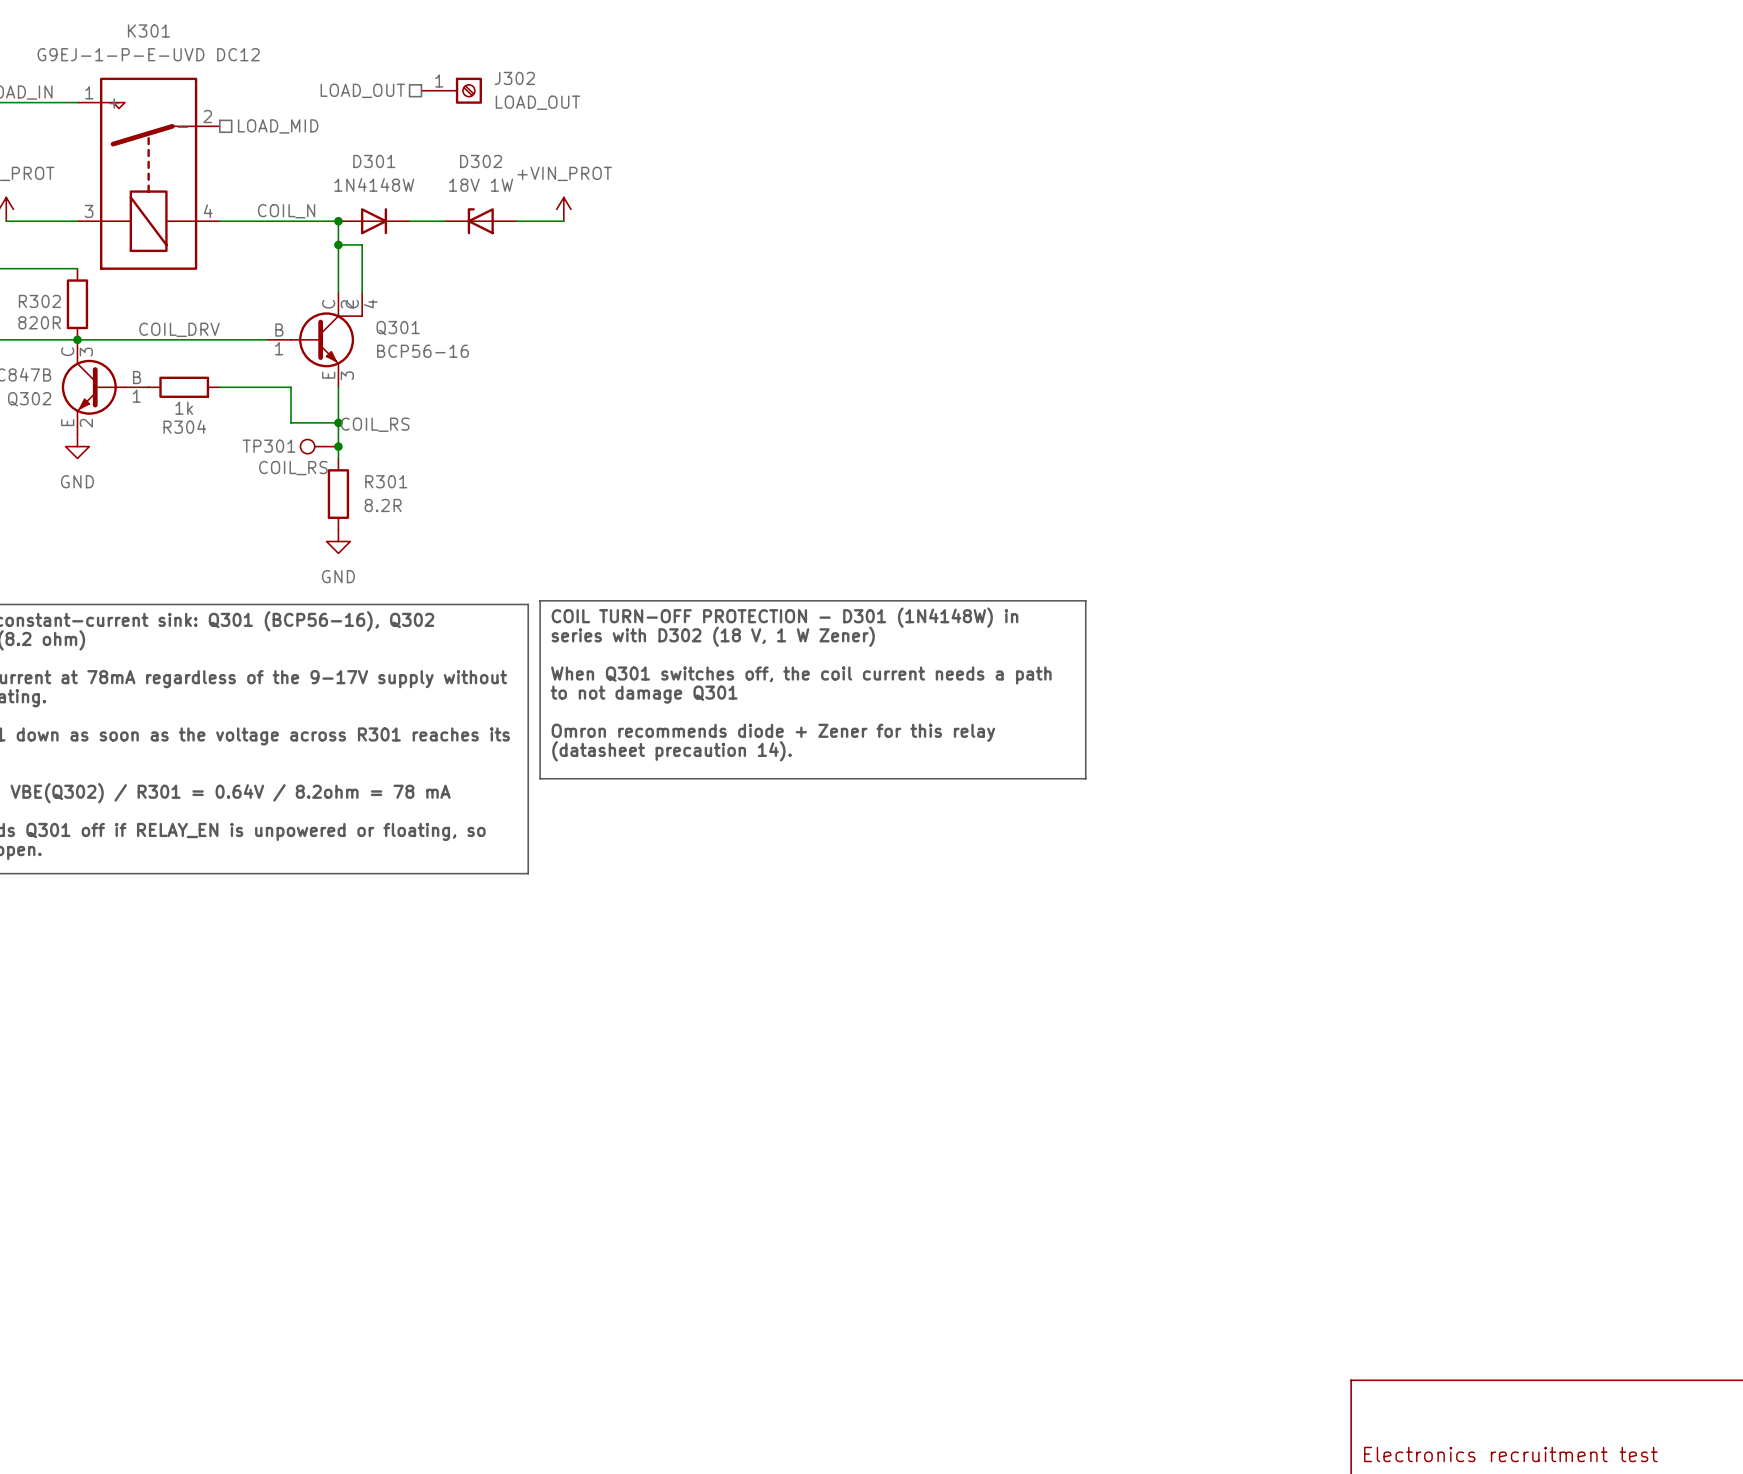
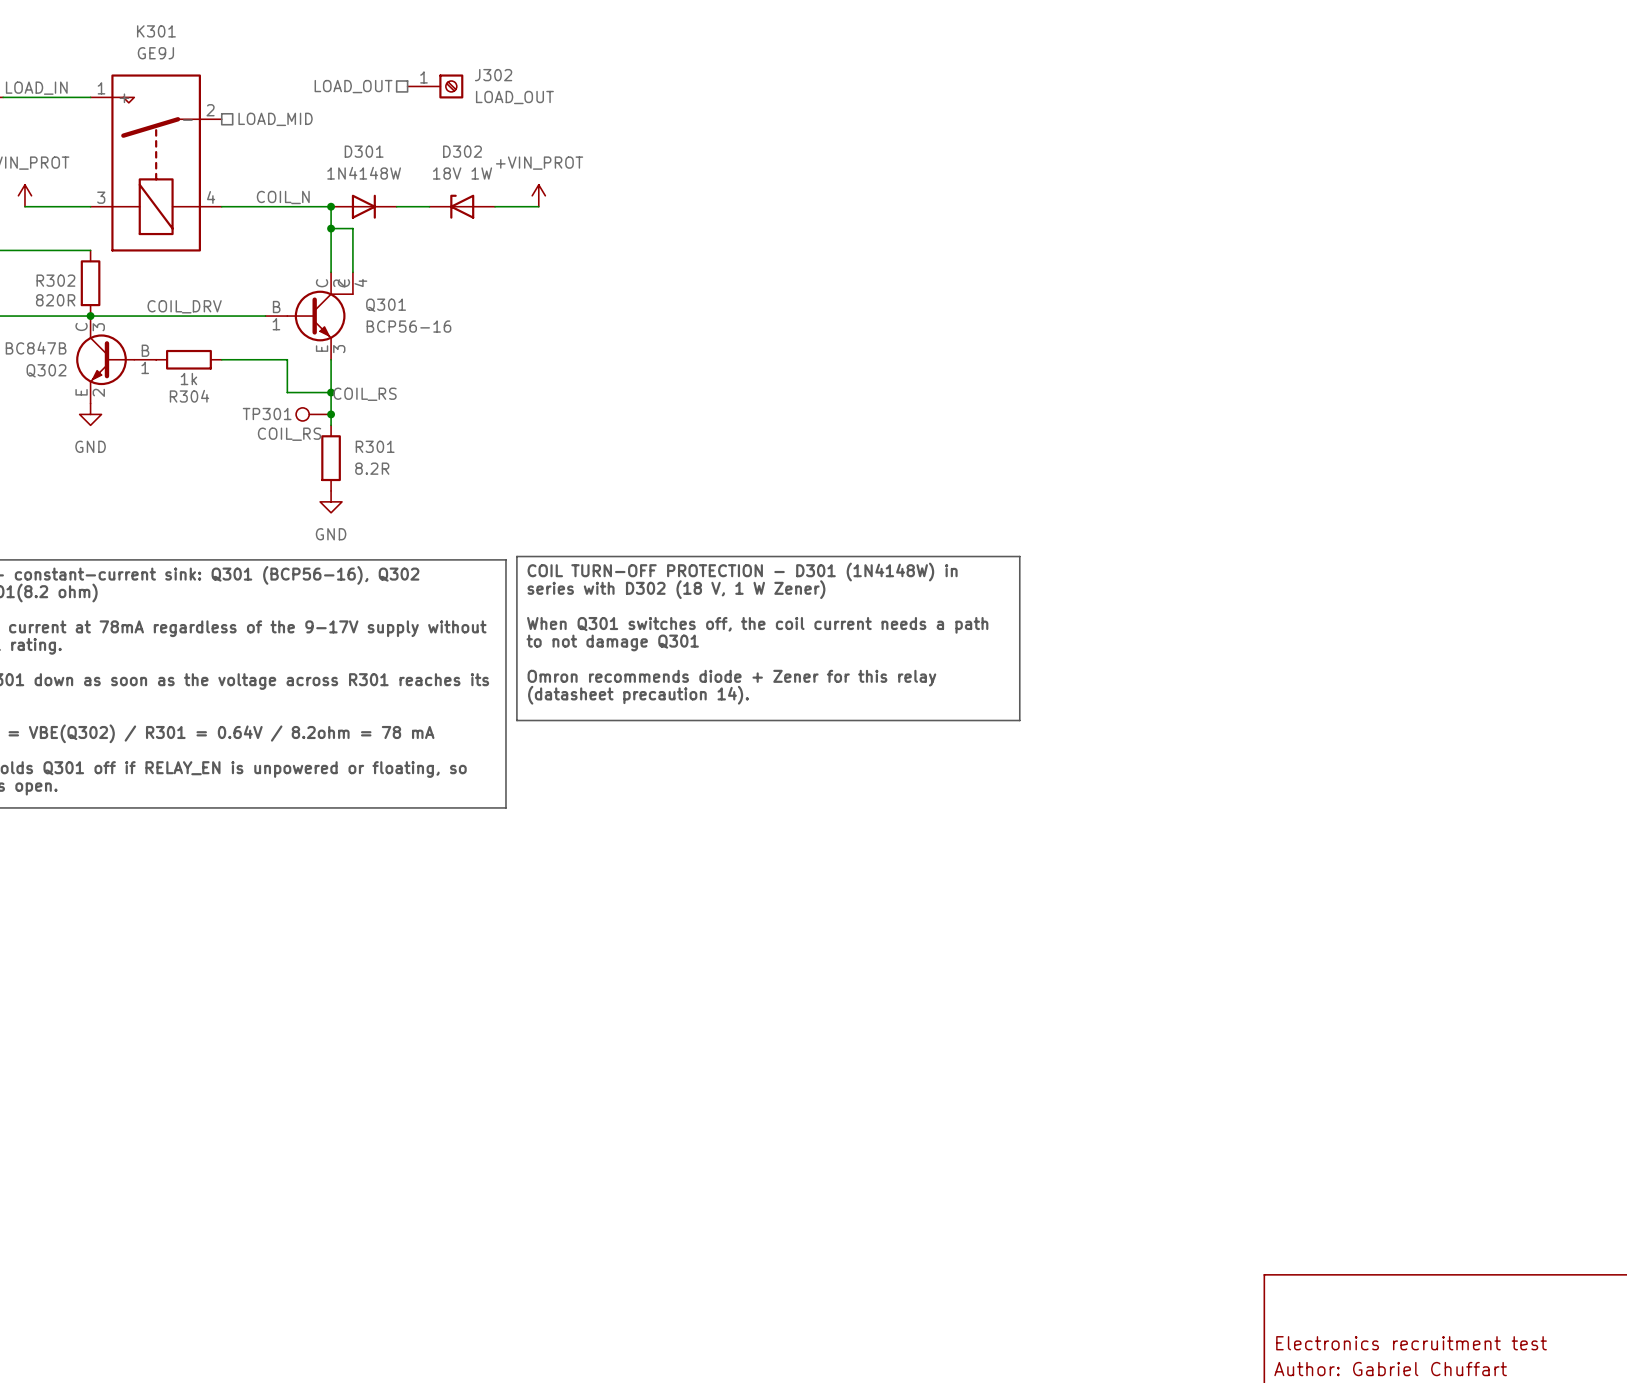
K301 value: G9EJ-1-P-E-UVD DC12 (148, 54) -> GE9J (155, 53)

